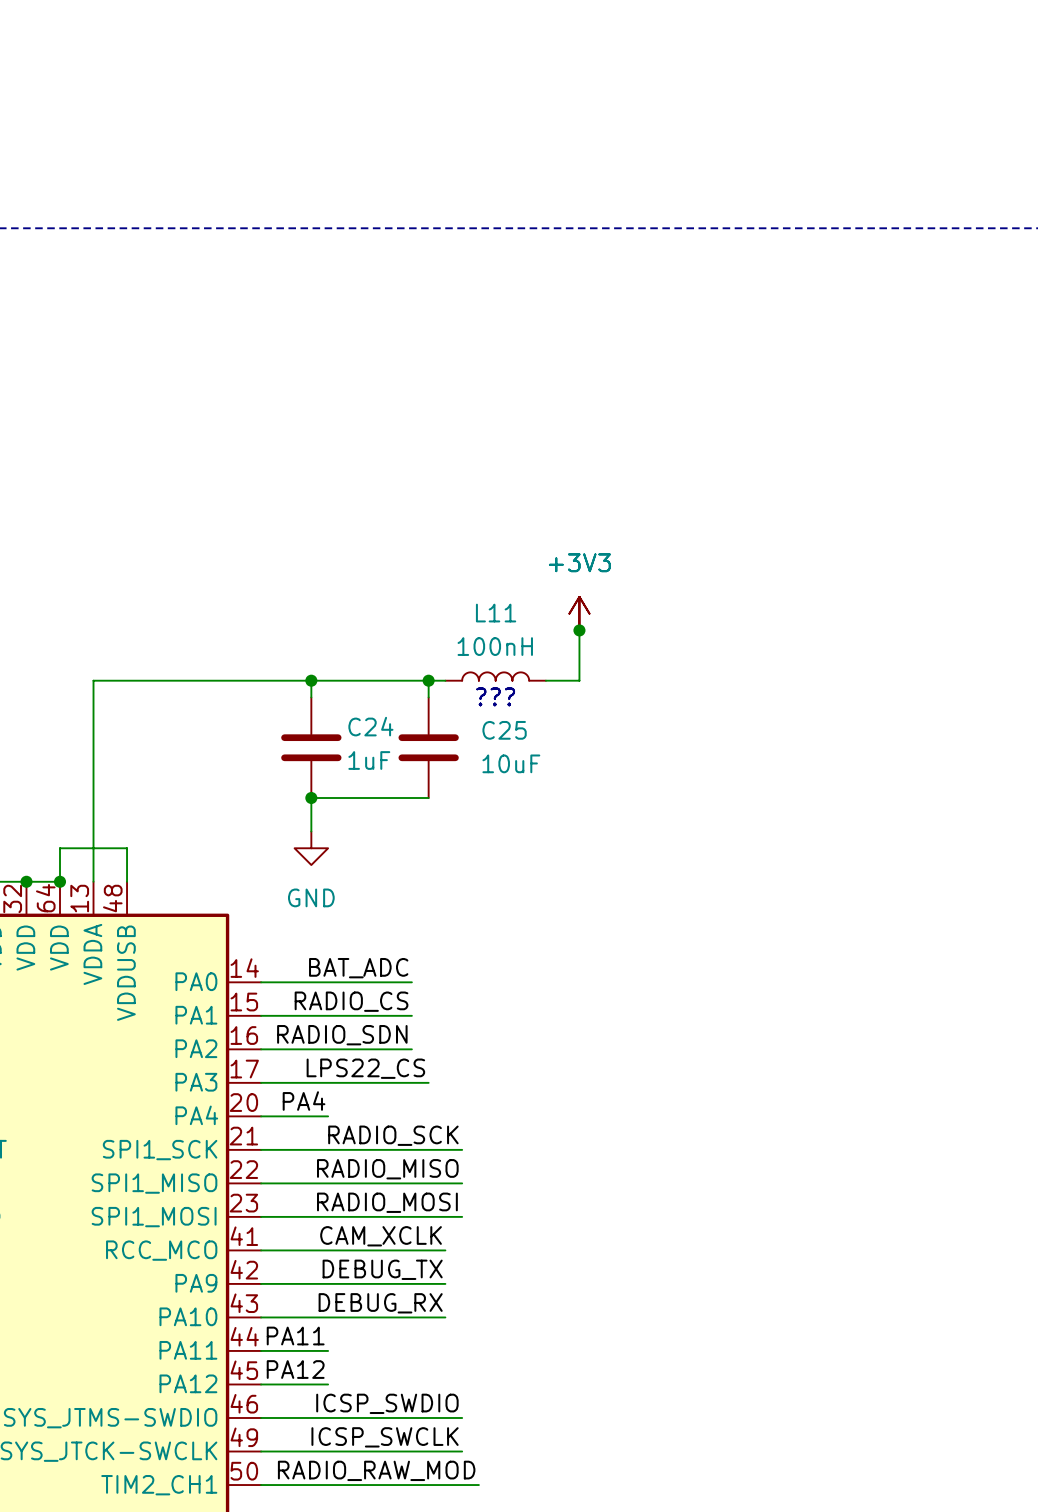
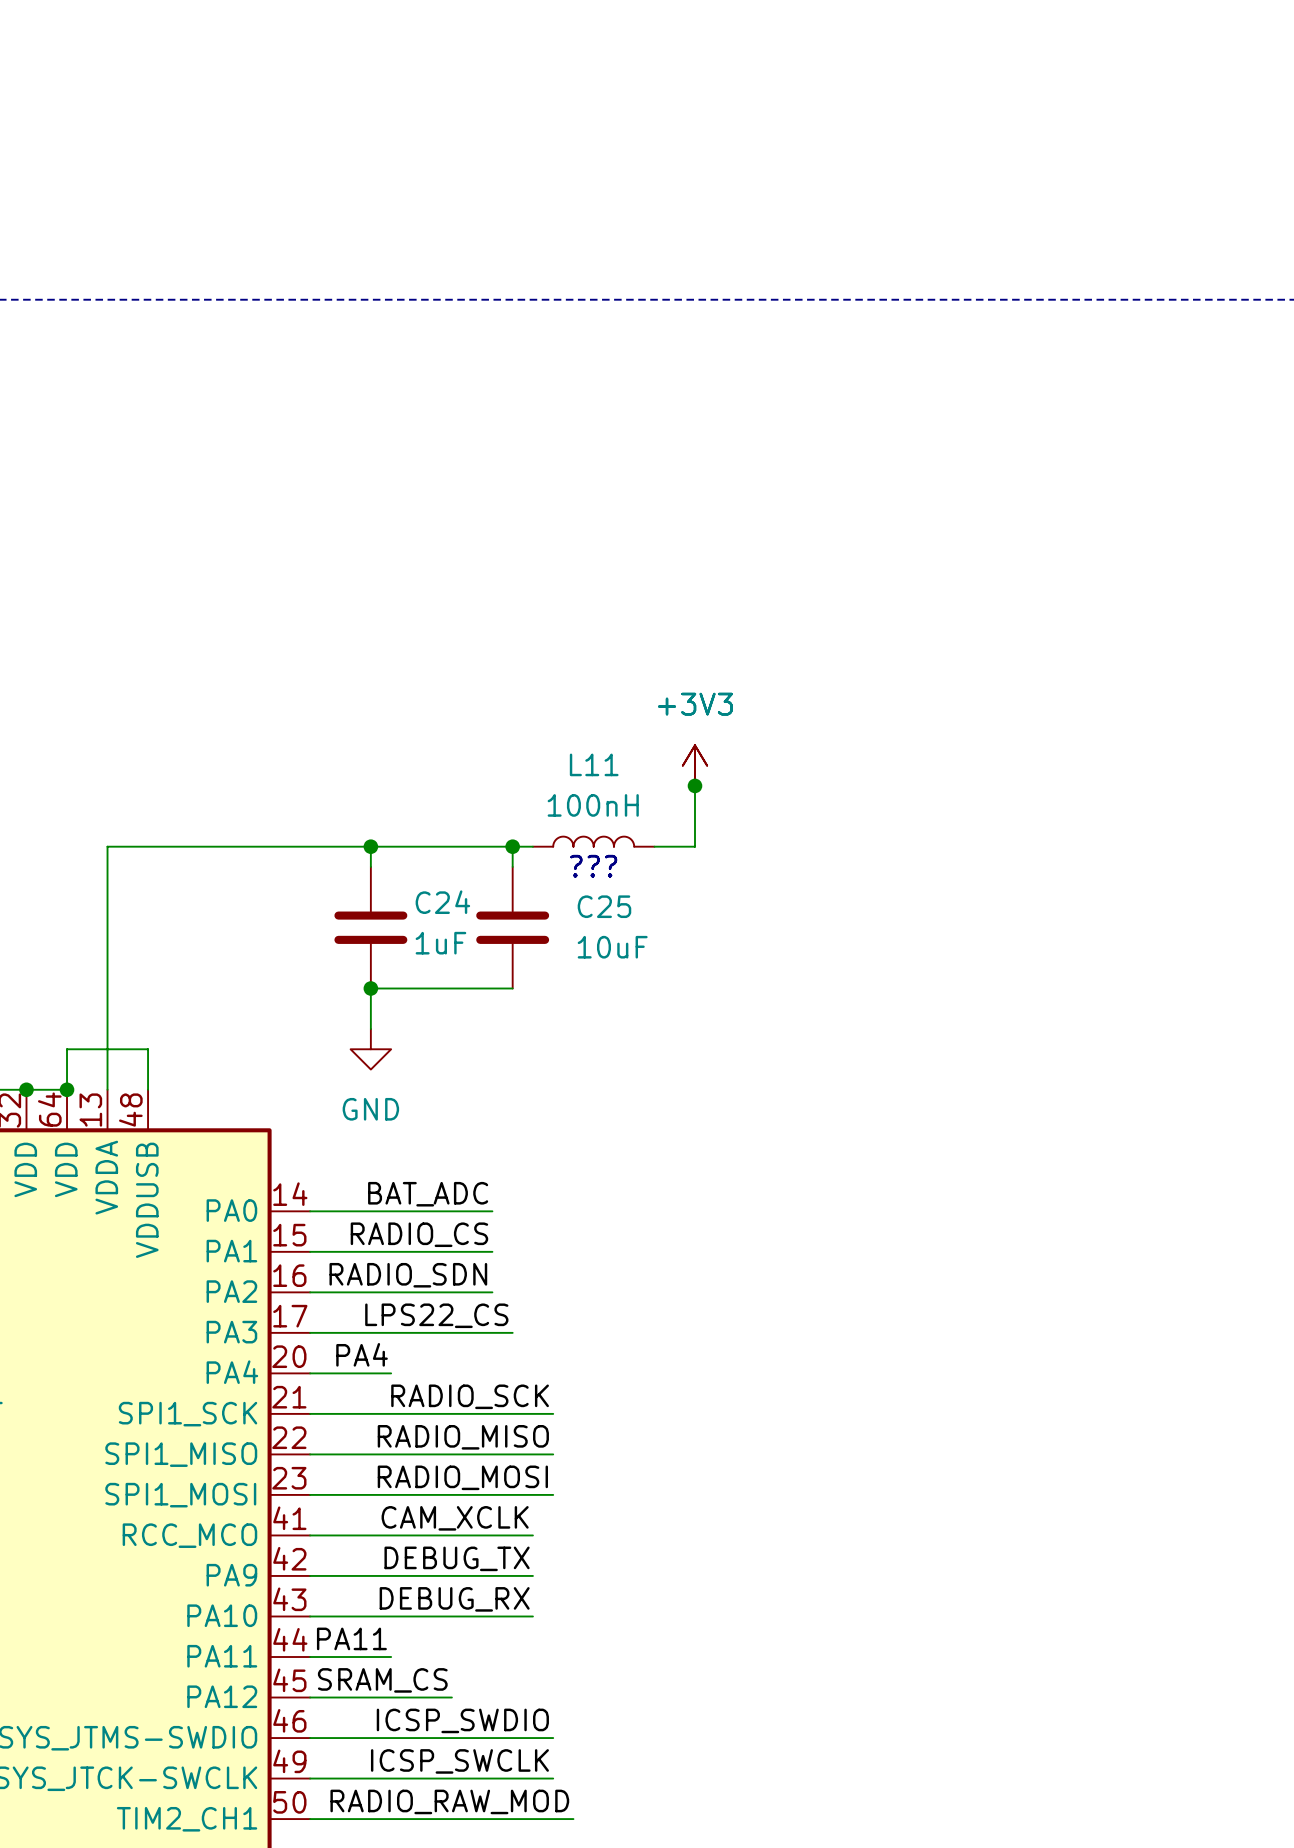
label: PA12 (295, 1369) -> none
label: none -> SRAM_CS (382, 1680)
wire: none -> (391, 1697) (451, 1697)

